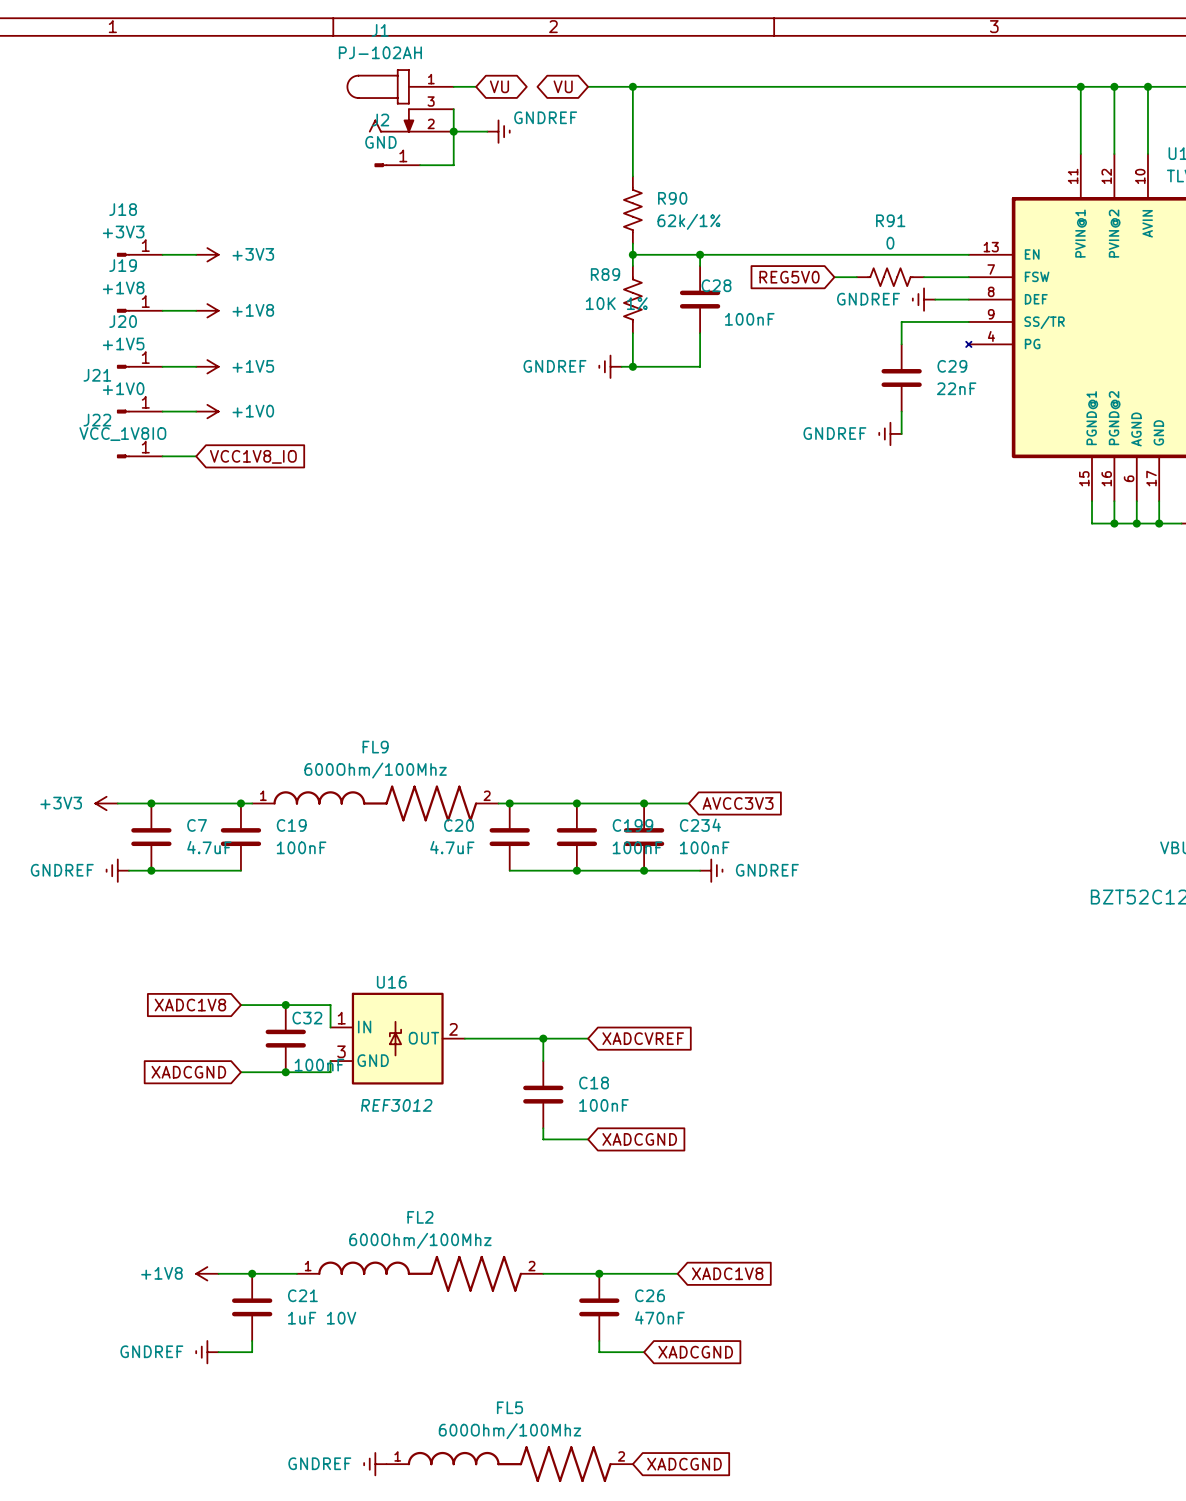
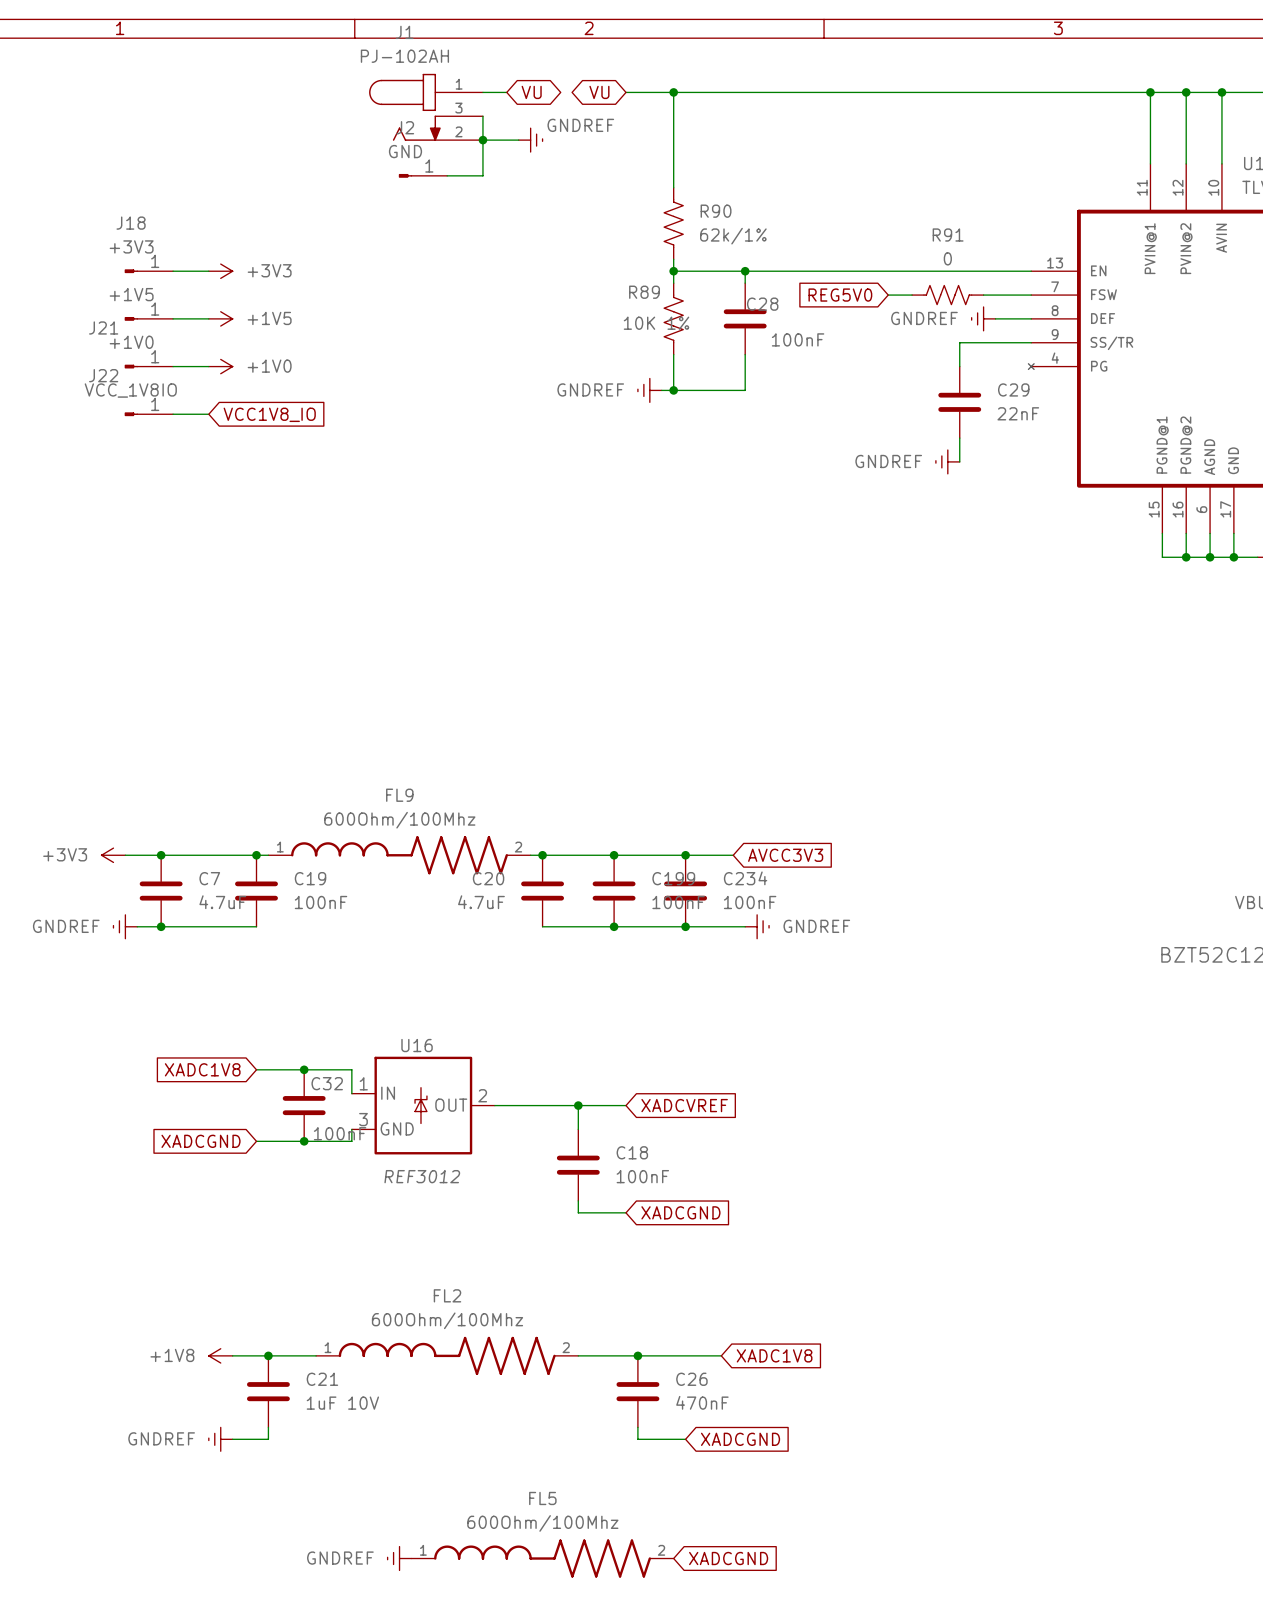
part: none -> +1V5 (148, 318)
J19: +1V8 (139, 310) -> none
wire: (162, 310) (196, 310) -> none
power symbol: +1V8 (207, 310) -> none
J20: +1V5 (139, 366) -> none
wire: (162, 366) (196, 366) -> (173, 318) (208, 318)
power symbol position: +1V5 (207, 366) -> +1V5 (220, 318)
J21 position: (139, 411) -> (148, 366)
wire: (162, 411) (196, 411) -> (173, 366) (208, 366)
power symbol position: +1V0 (207, 411) -> +1V0 (220, 366)
J22 position: (139, 456) -> (148, 414)
wire: (162, 456) (196, 456) -> (173, 414) (208, 414)
global label position: VCC1V8_IO (253, 456) -> VCC1V8_IO (269, 414)

